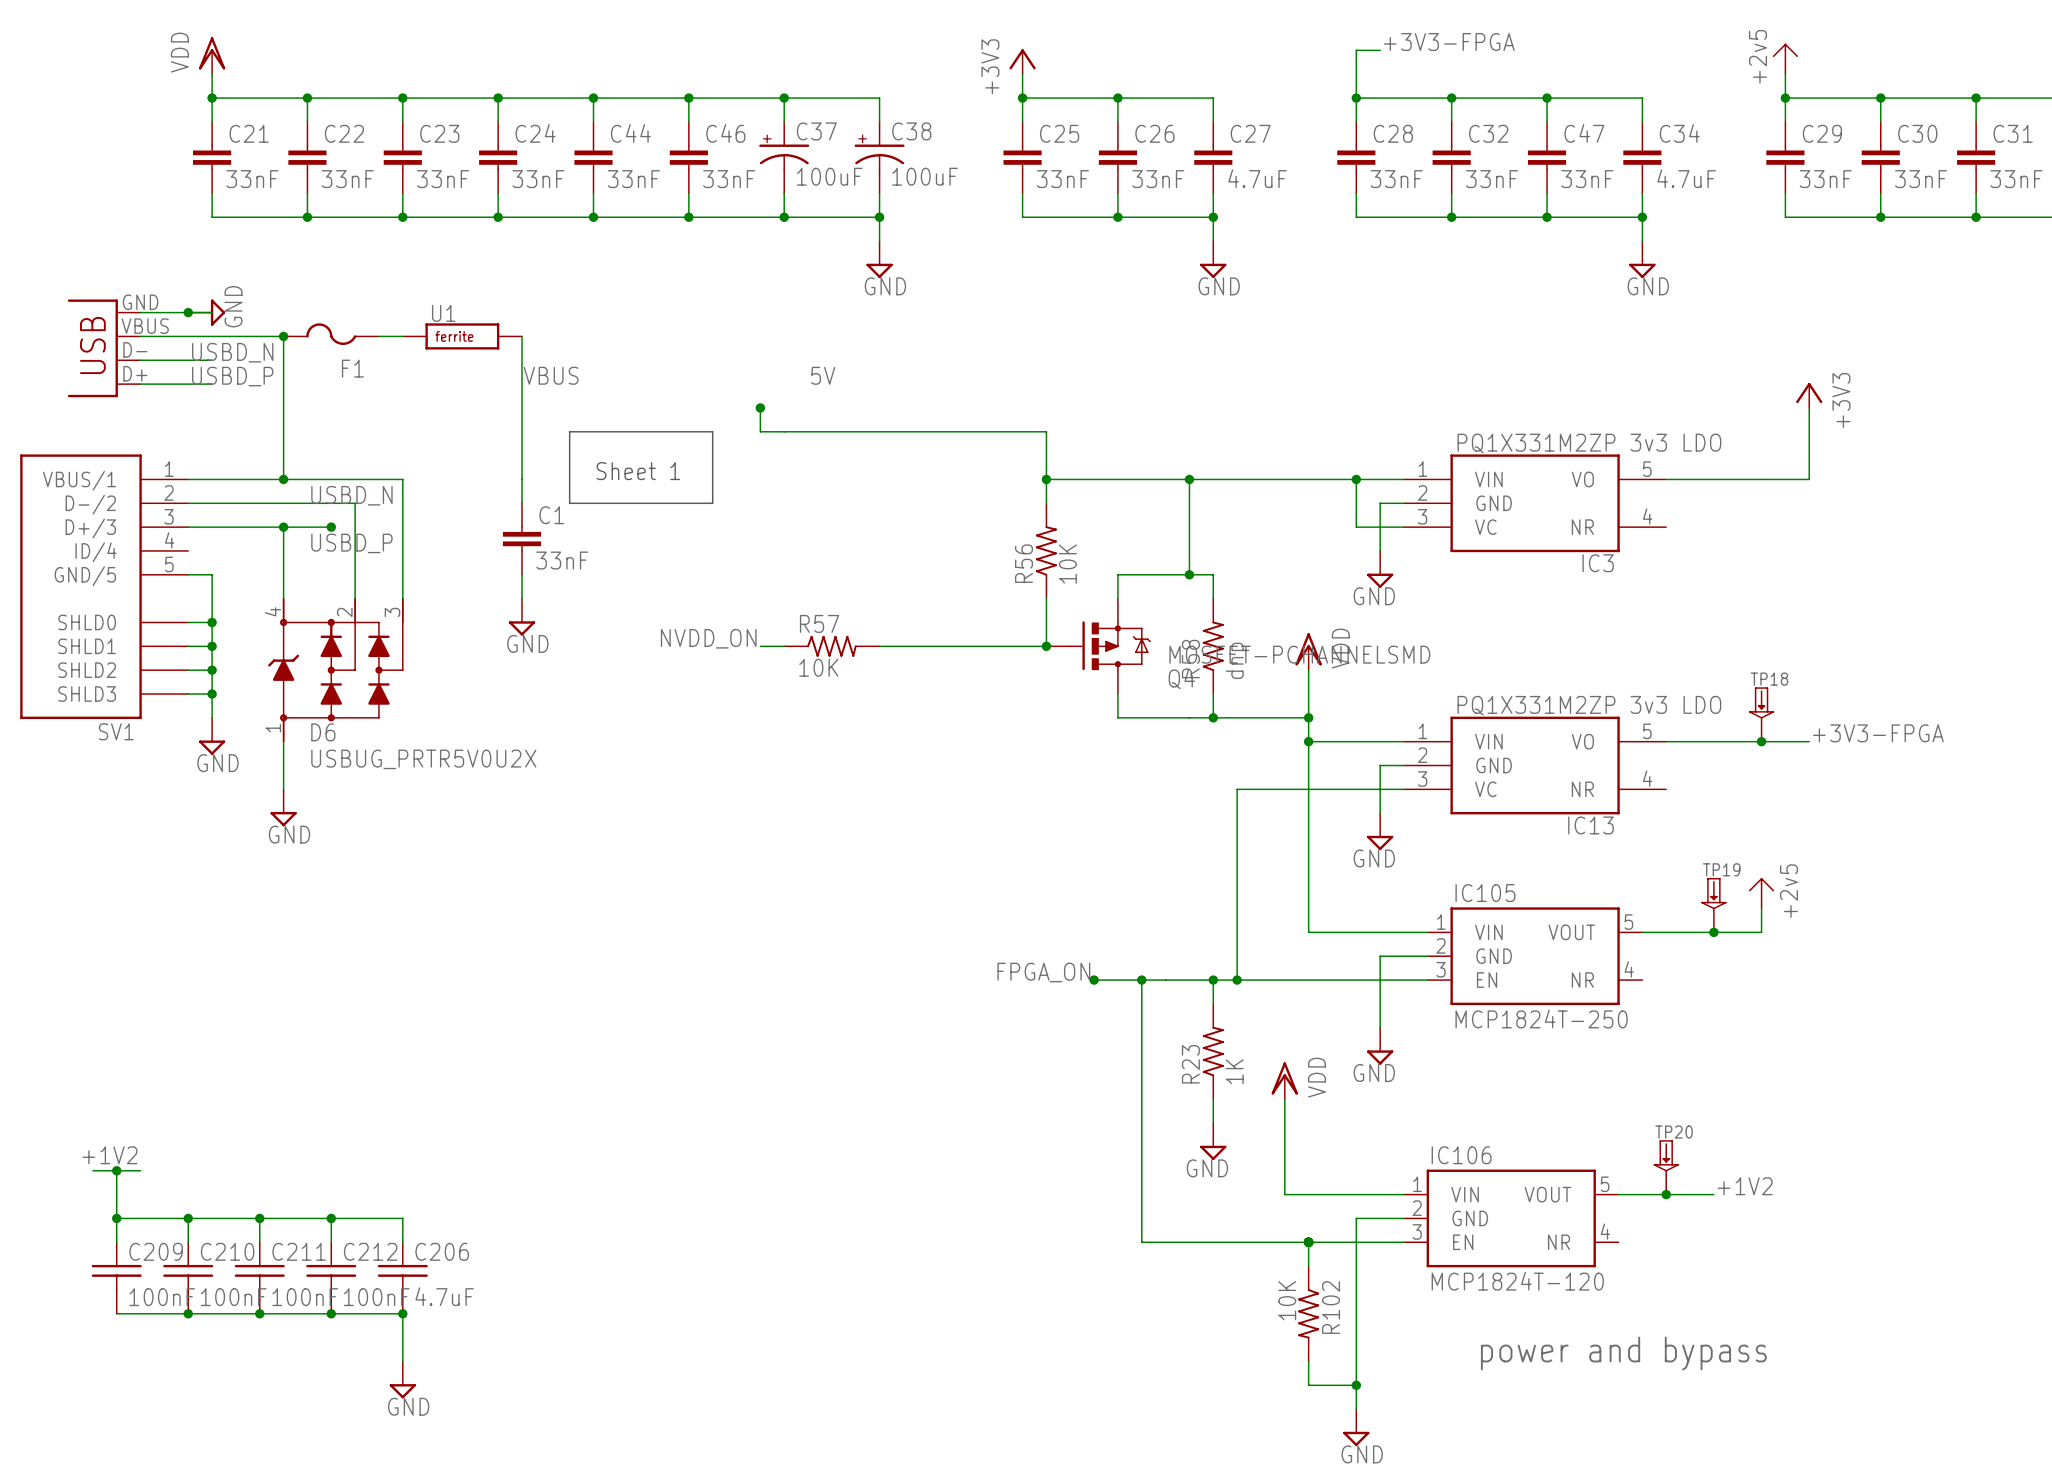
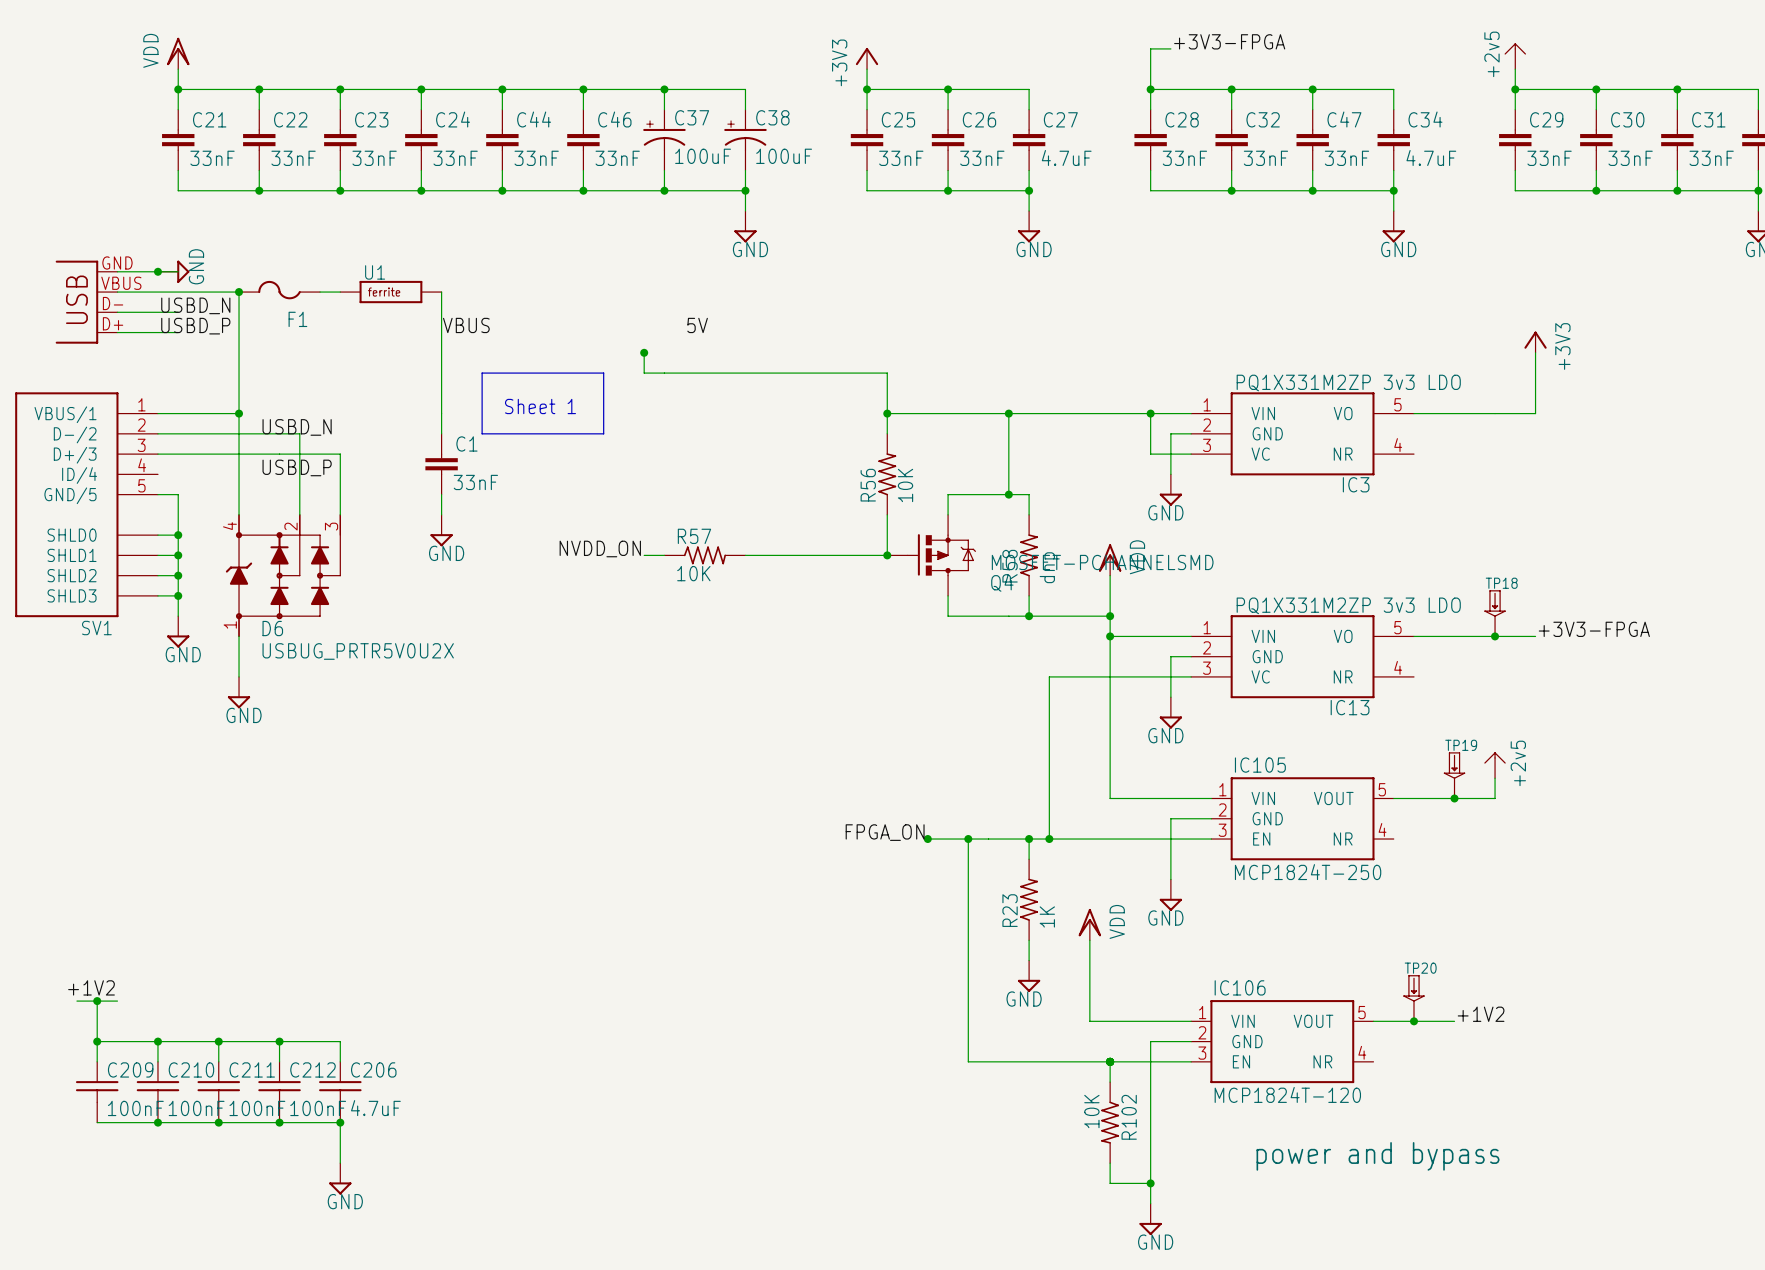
wire: (283, 479) (402, 479) (402, 527) -> (279, 454) (340, 454)
wire: none -> (239, 413) (239, 454)
junction: (283, 527) -> none
junction: (331, 527) -> none

